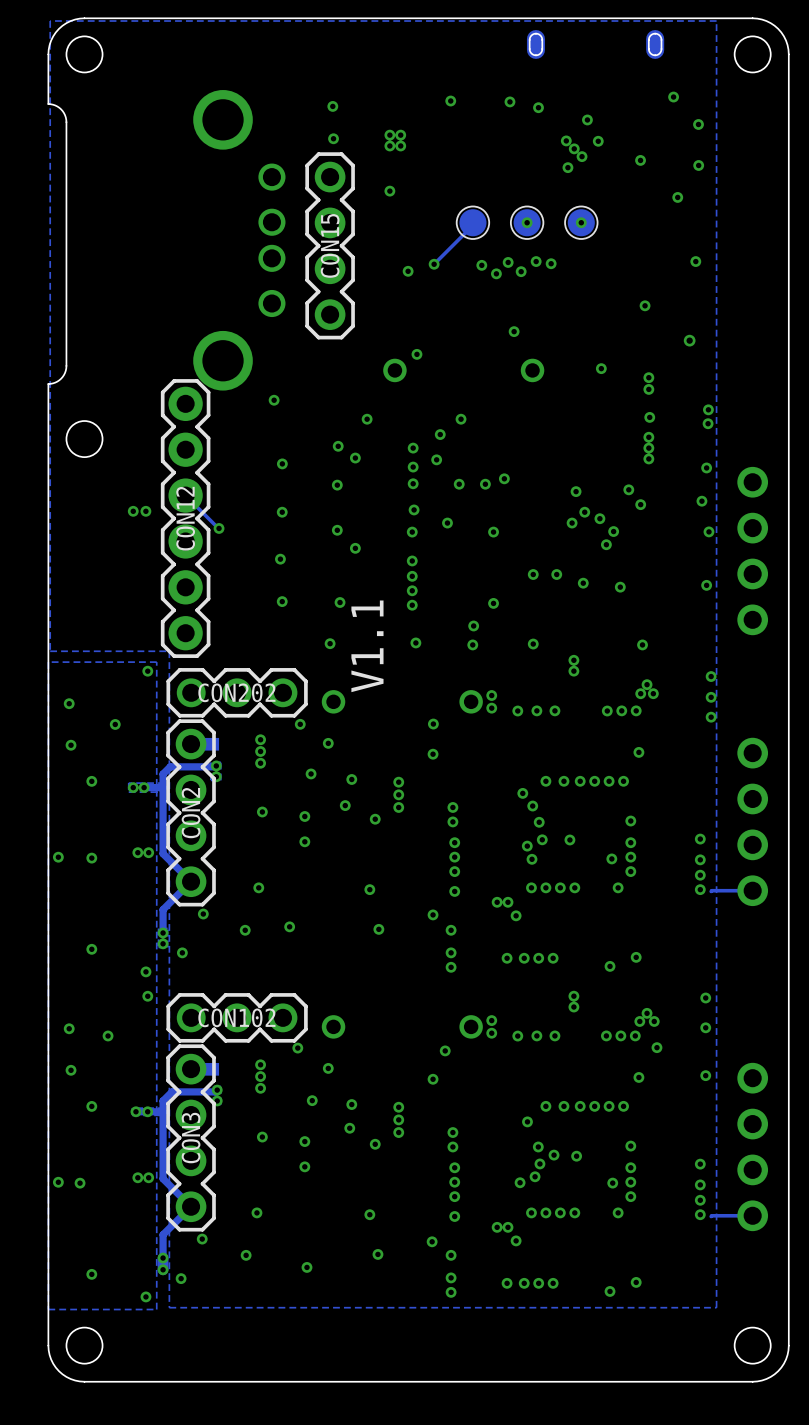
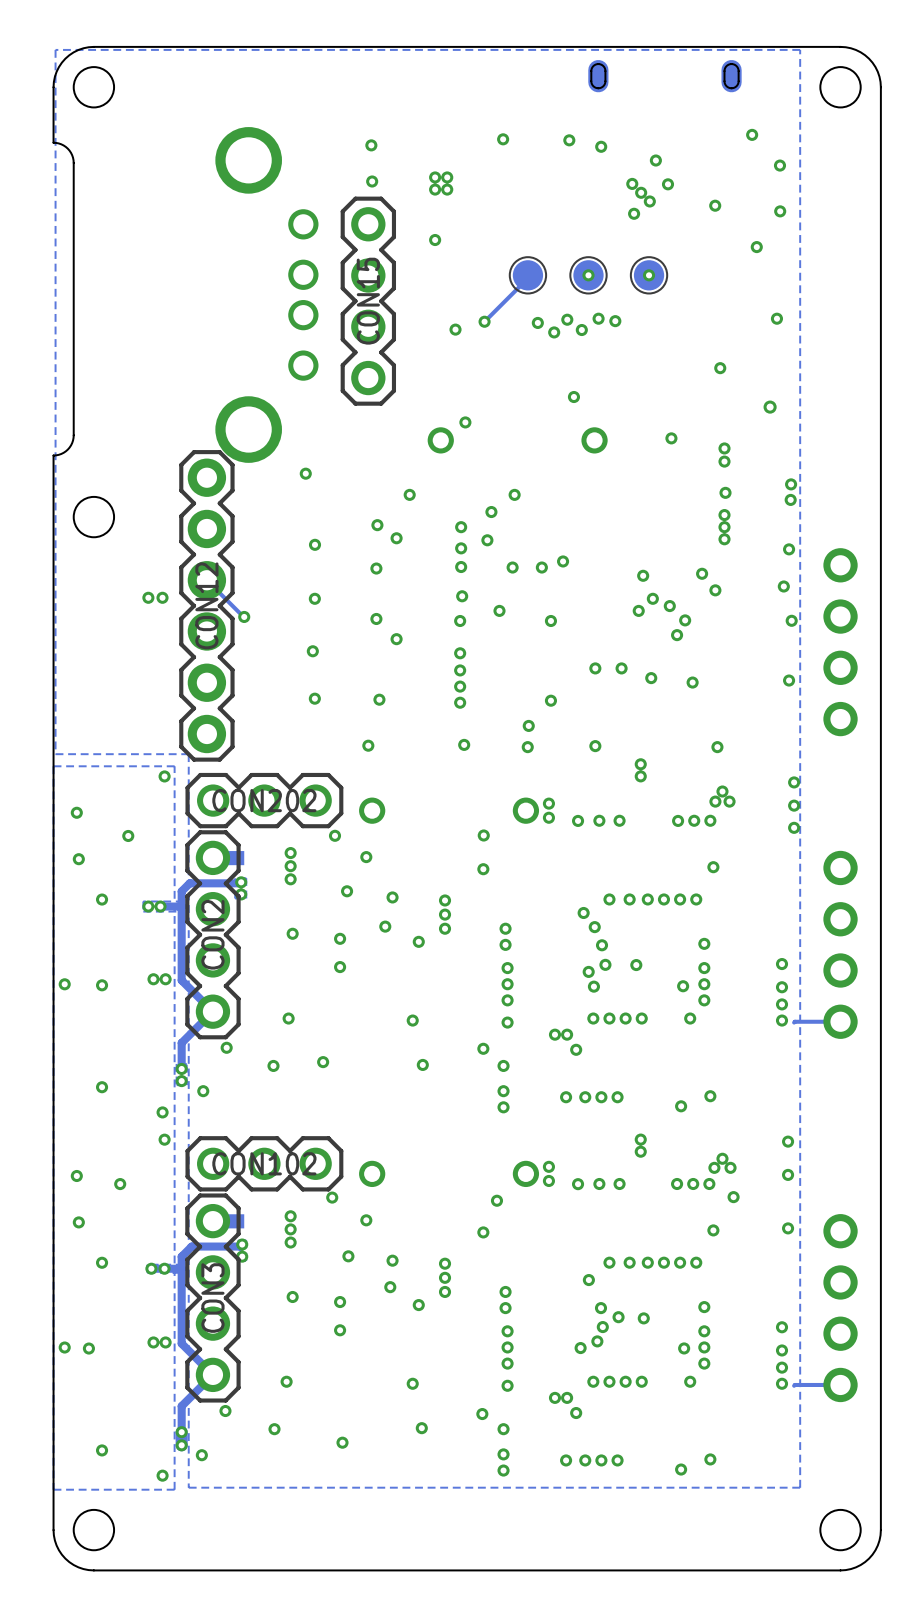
text: V1.1 (367, 646) -> none

